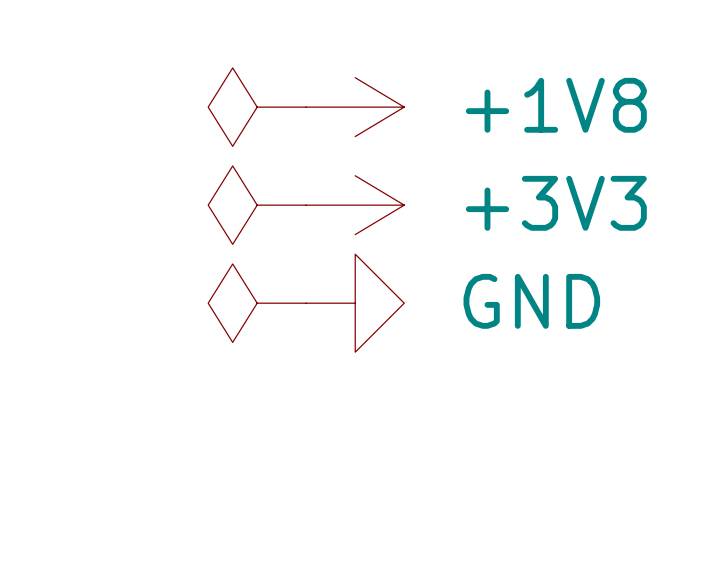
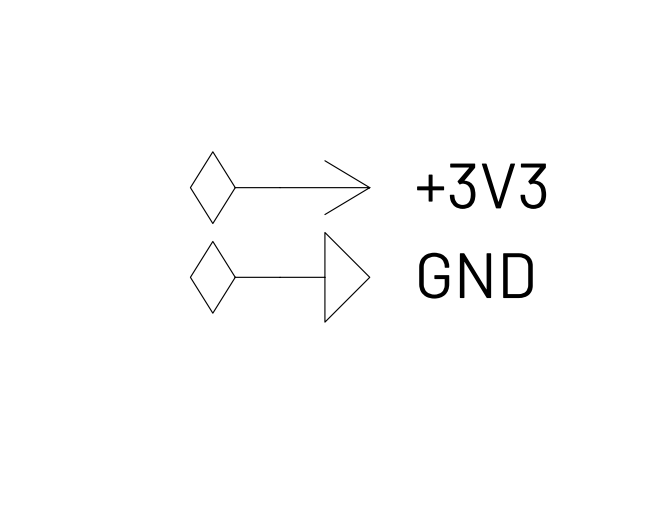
power symbol: (257, 107) -> none
power symbol: +1V8 (355, 107) -> none

